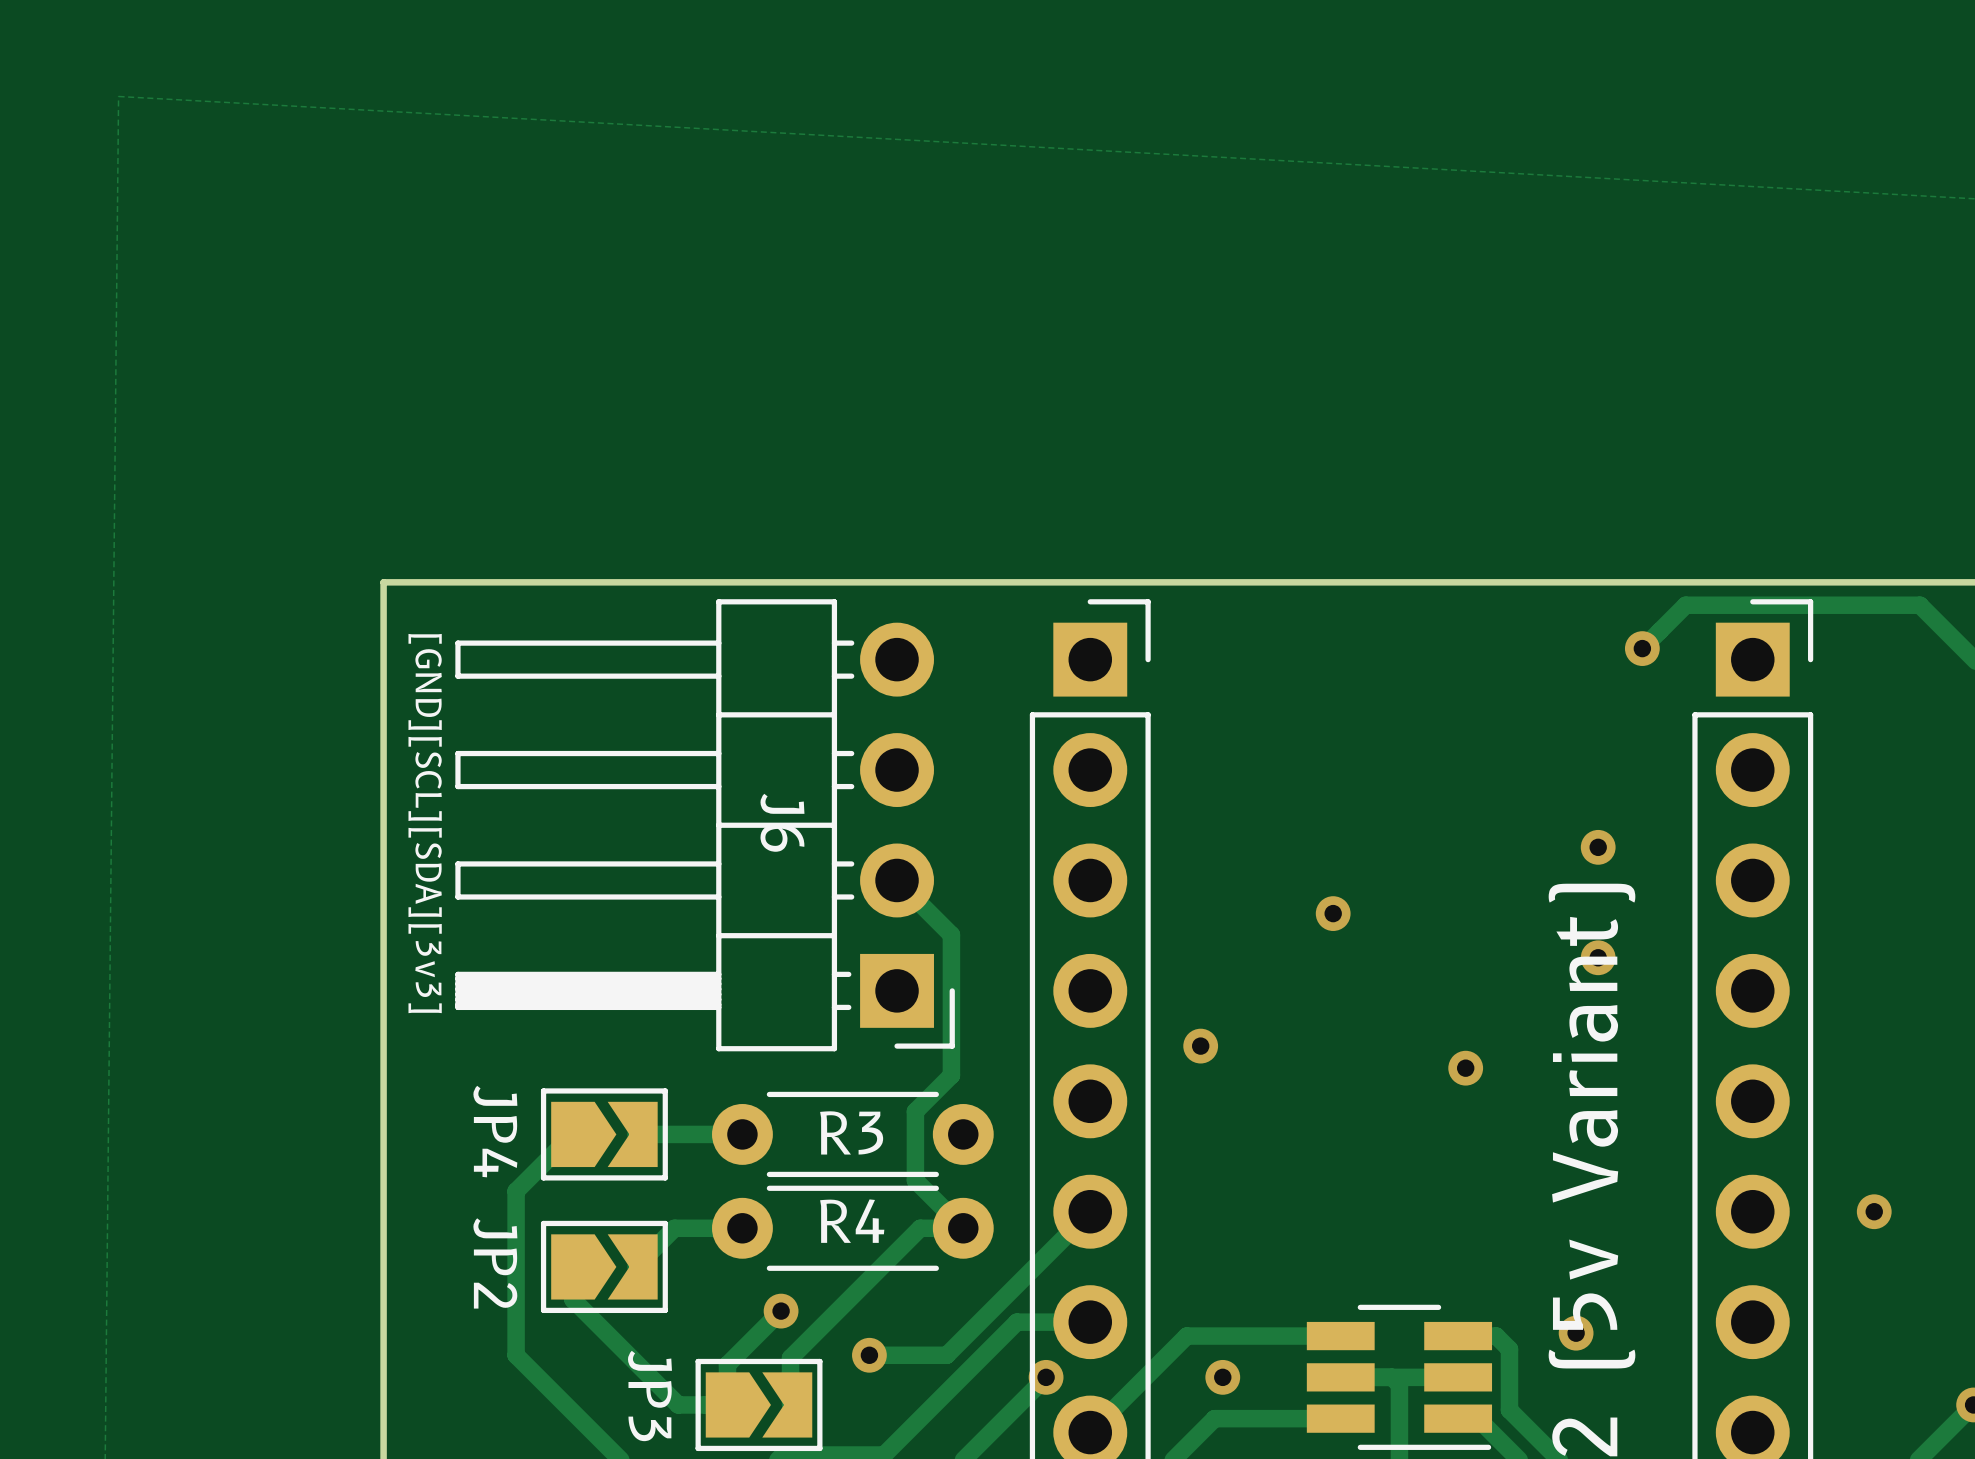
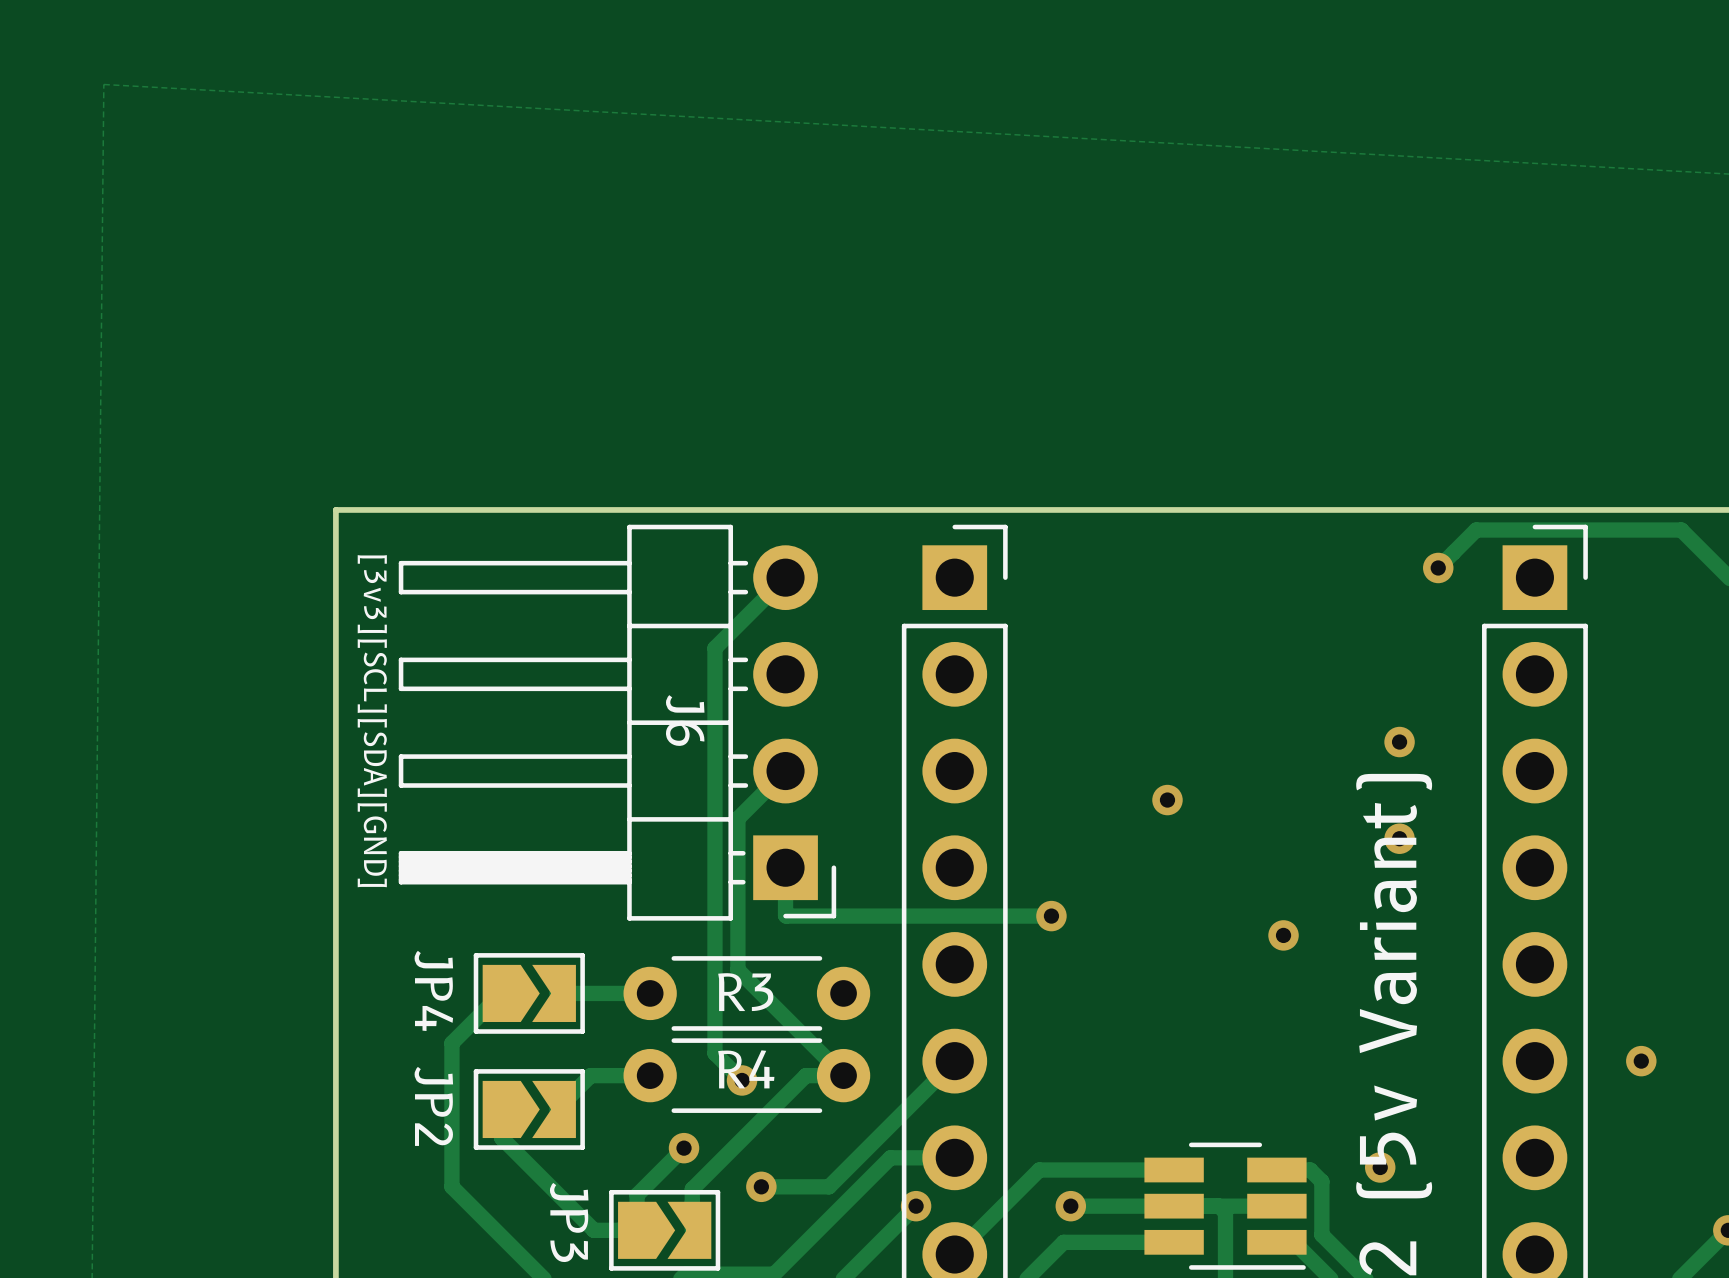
track: none -> (785, 577) (714, 648) (714, 1053) (742, 1080)
text: [GND][SCL][SDA][3v3] (425, 823) -> [3v3][SCL][SDA][GND] (372, 721)
track: (897, 880) (951, 934) (951, 1075) (915, 1111) (915, 1180) -> (785, 771) (737, 818) (737, 969) (801, 1033)
track: none -> (785, 867) (786, 916) (1051, 916)
via: none -> (742, 1080)
track: none -> (1070, 1206) (1174, 1206)

